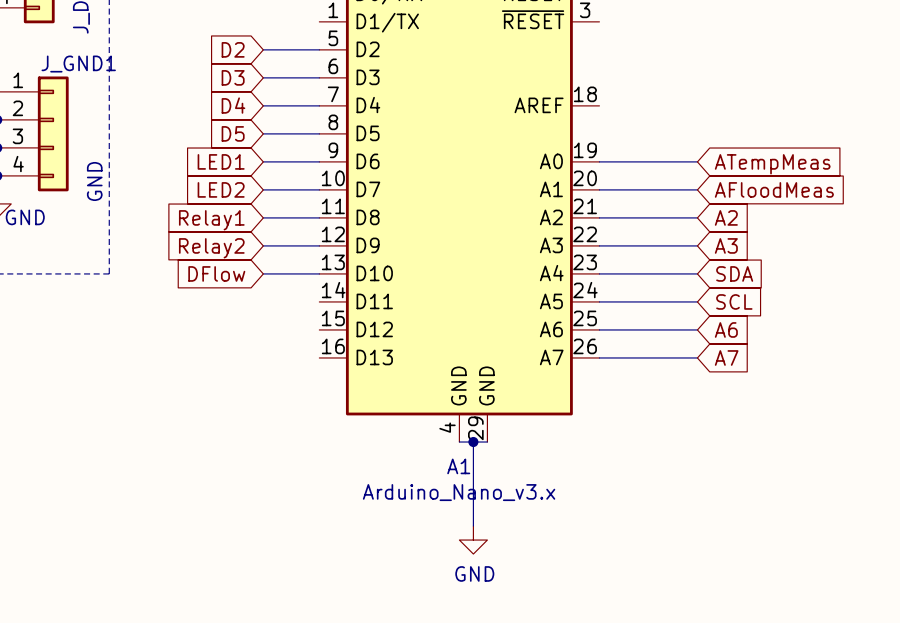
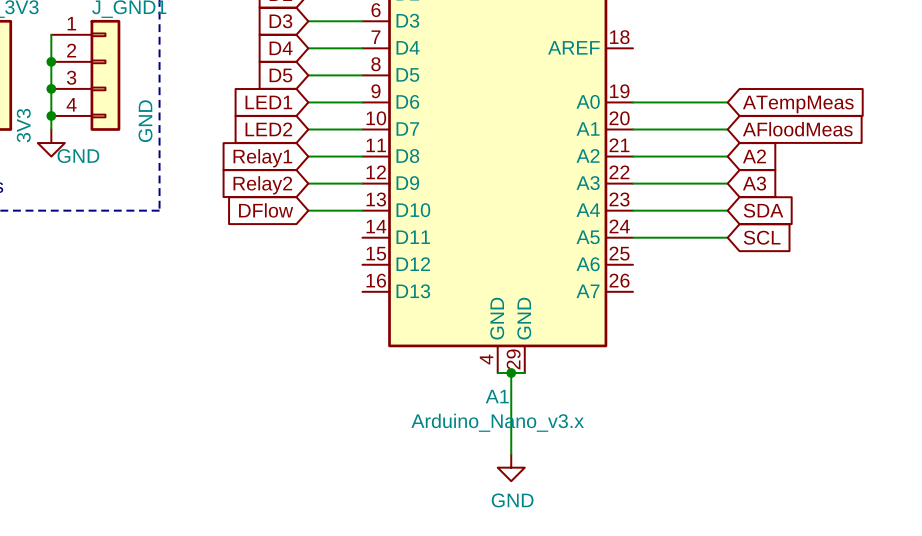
wire: (599, 329) (697, 329) -> none
global label: A6 (726, 329) -> none
wire: (599, 357) (697, 357) -> none
global label: A7 (726, 357) -> none

